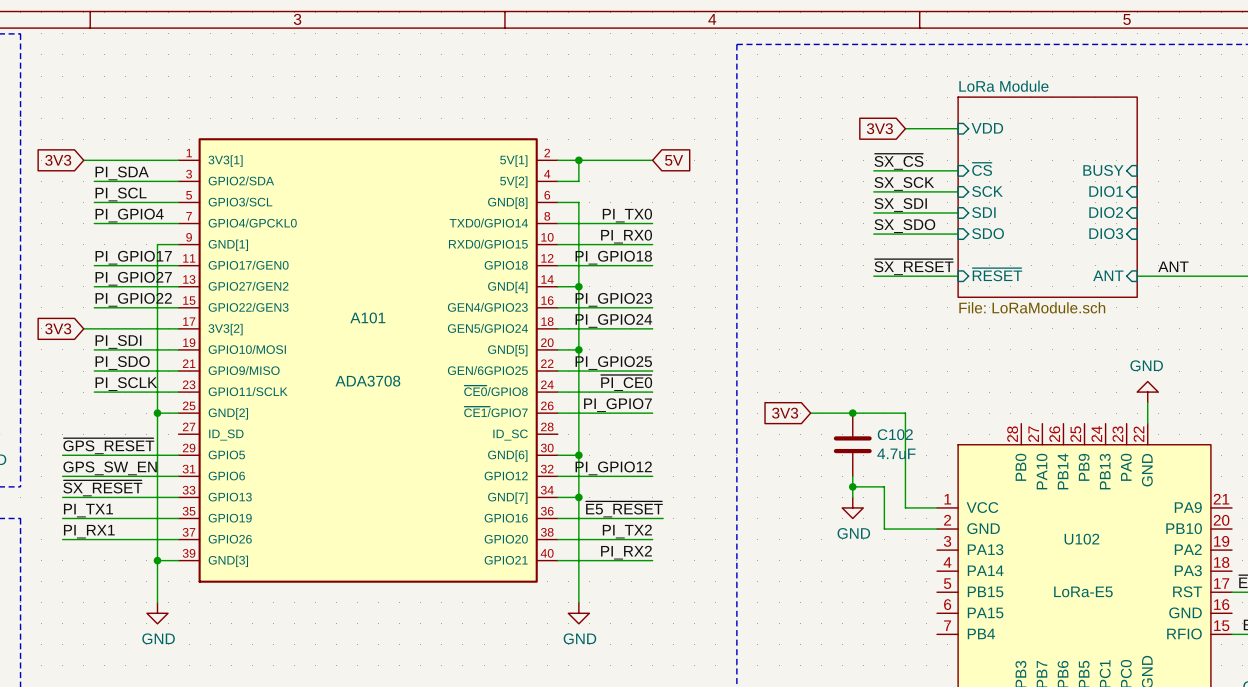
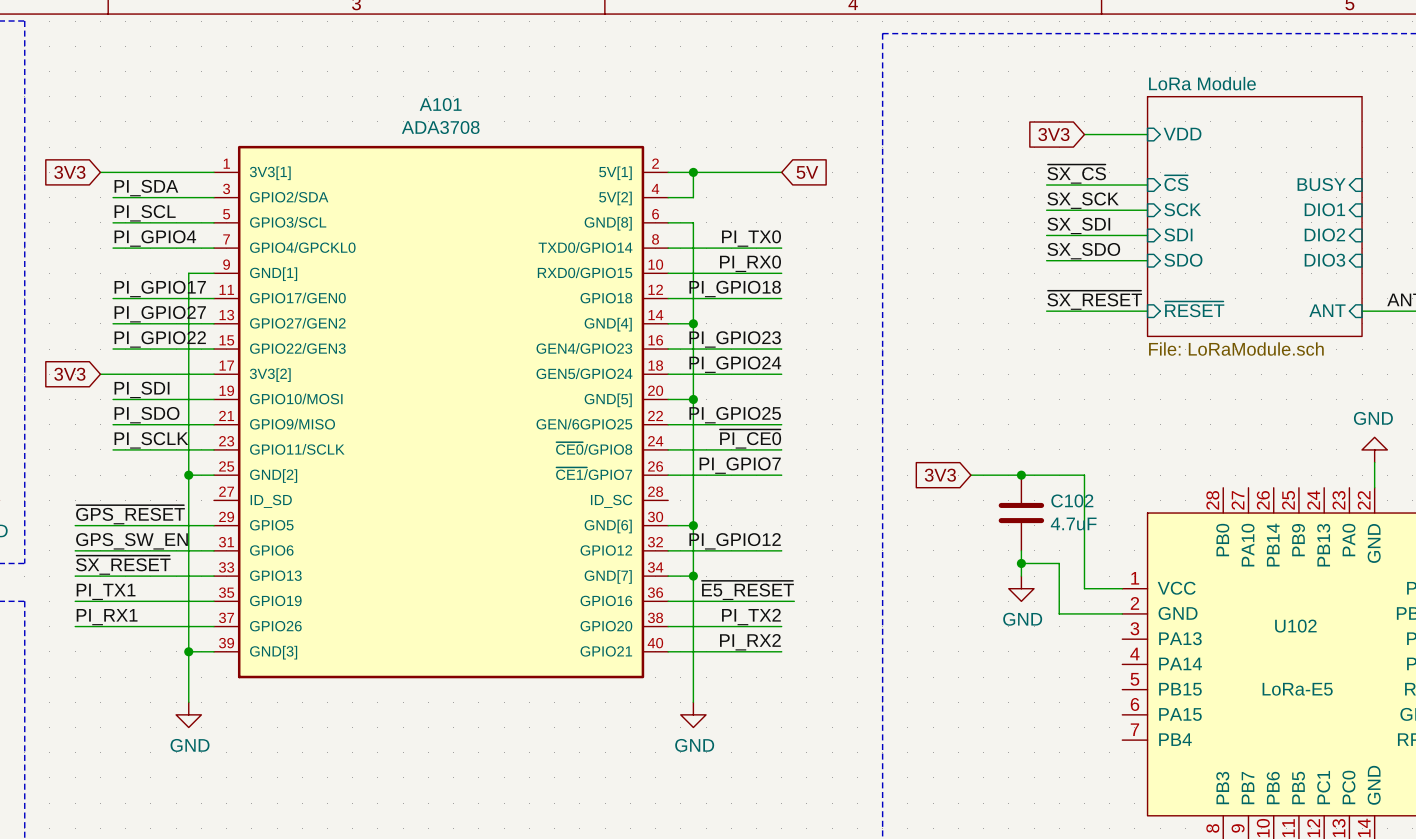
A101 name position: A101 (367, 317) -> A101 (440, 104)
A101 value position: ADA3708 (367, 381) -> ADA3708 (440, 127)

